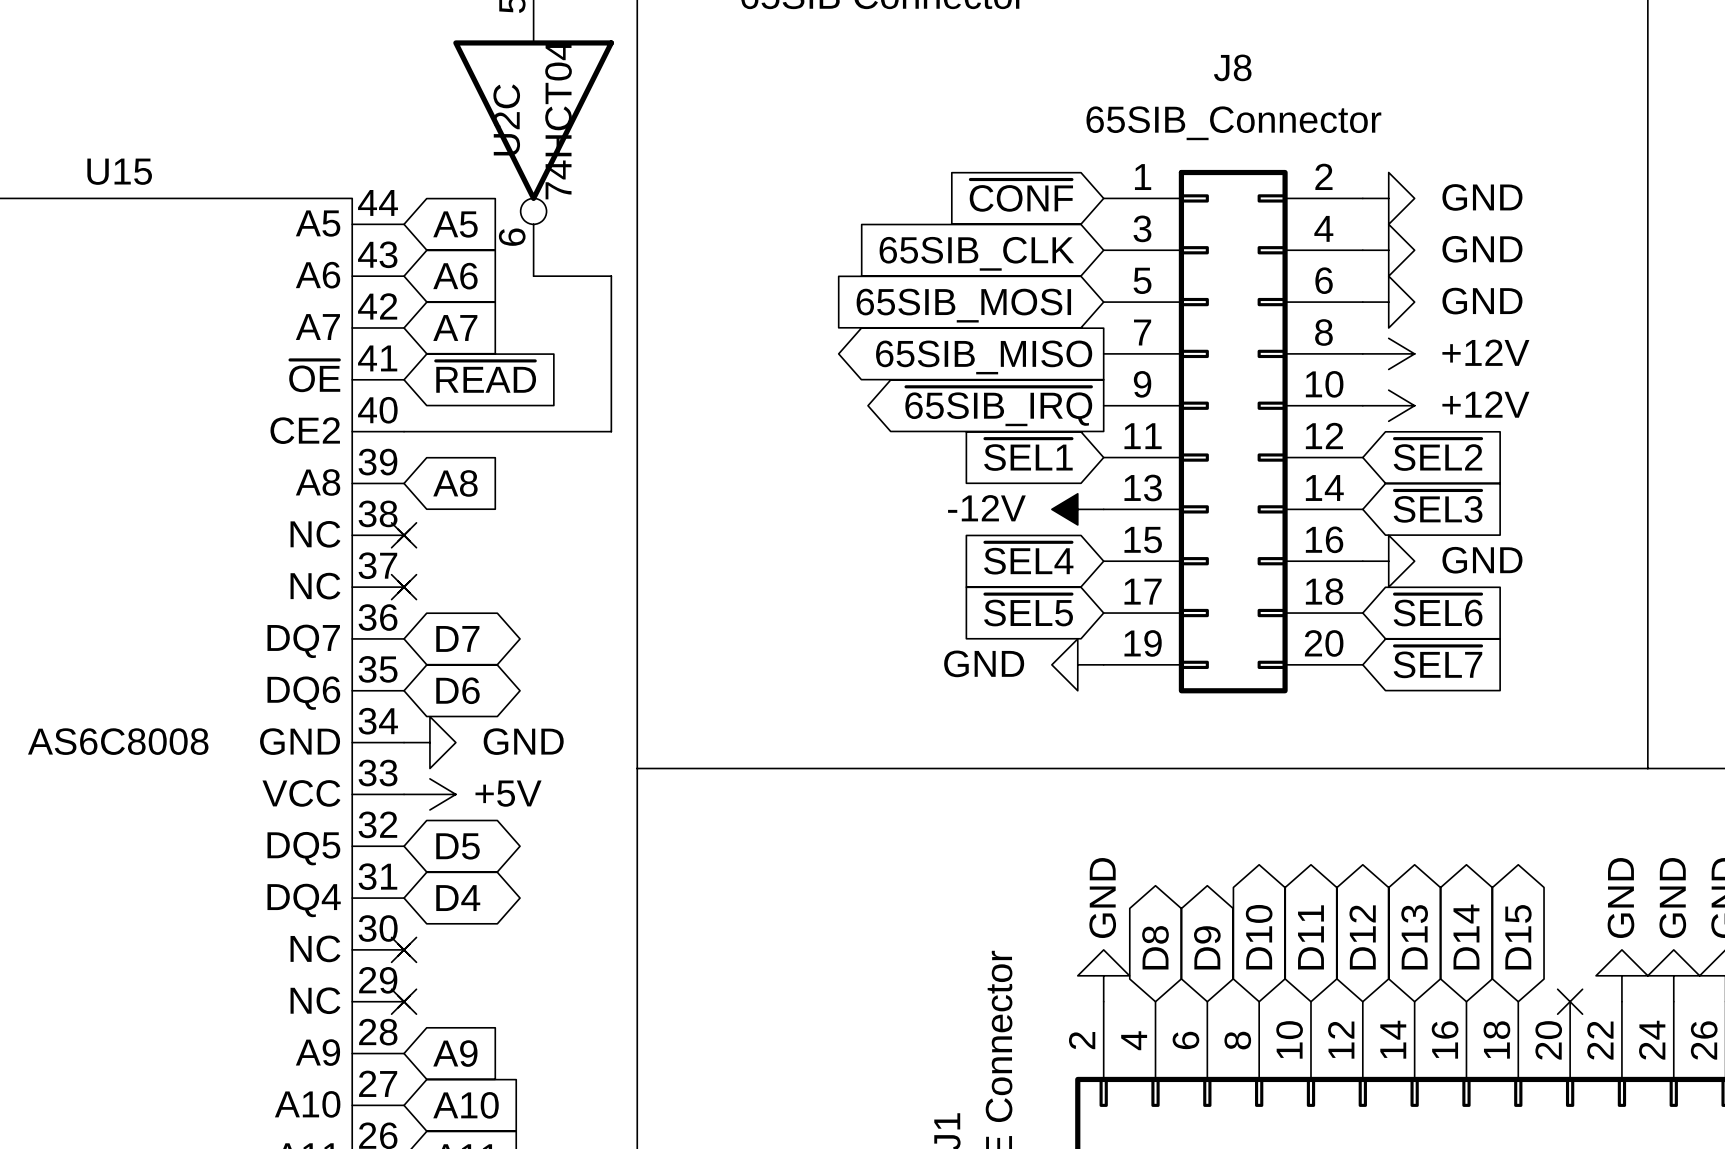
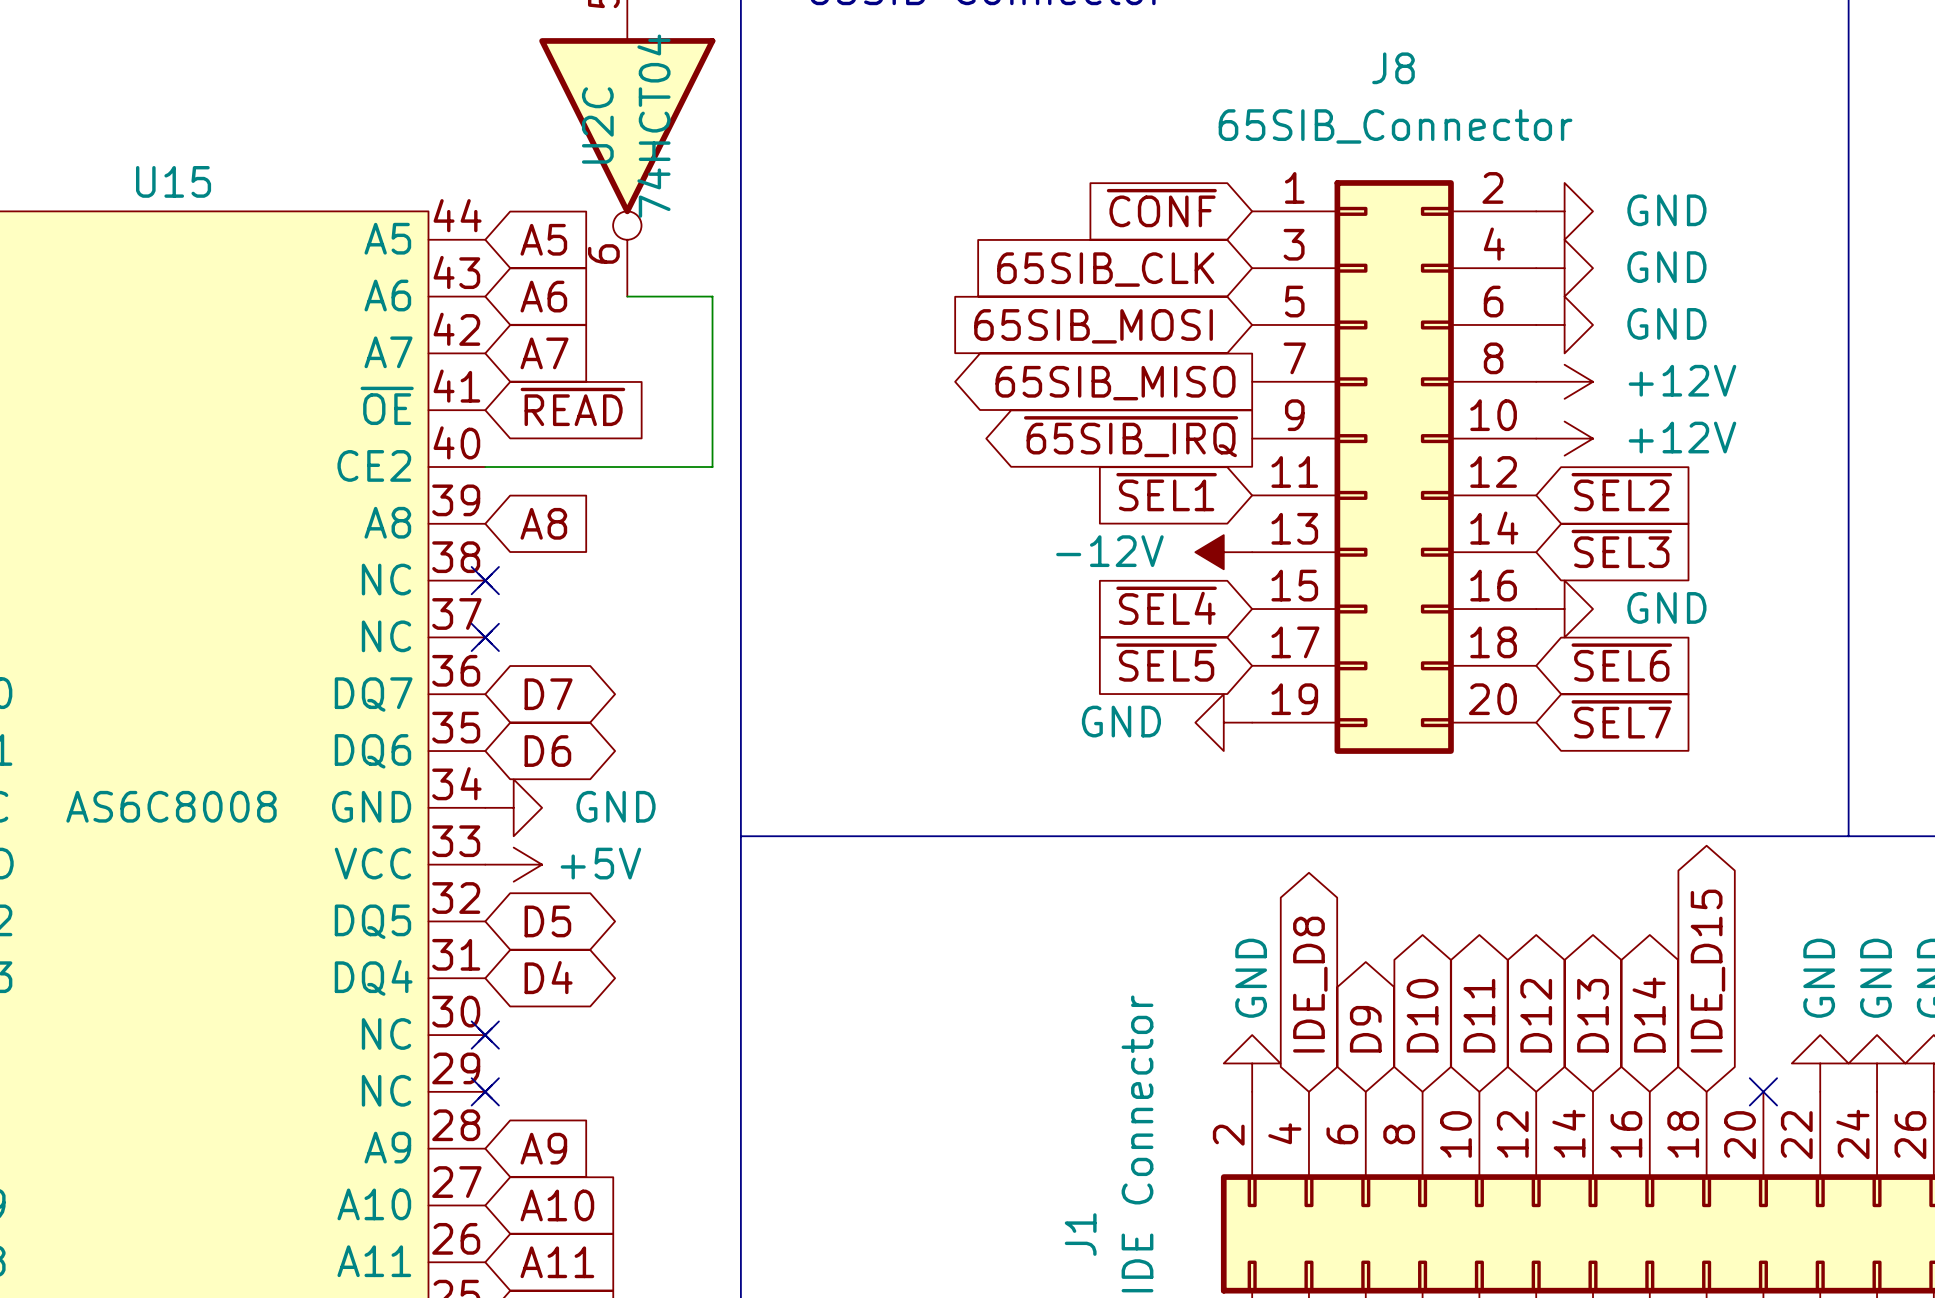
global label: D15 (1518, 937) -> IDE_D15 (1707, 971)
global label: D8 (1155, 947) -> IDE_D8 (1310, 984)

